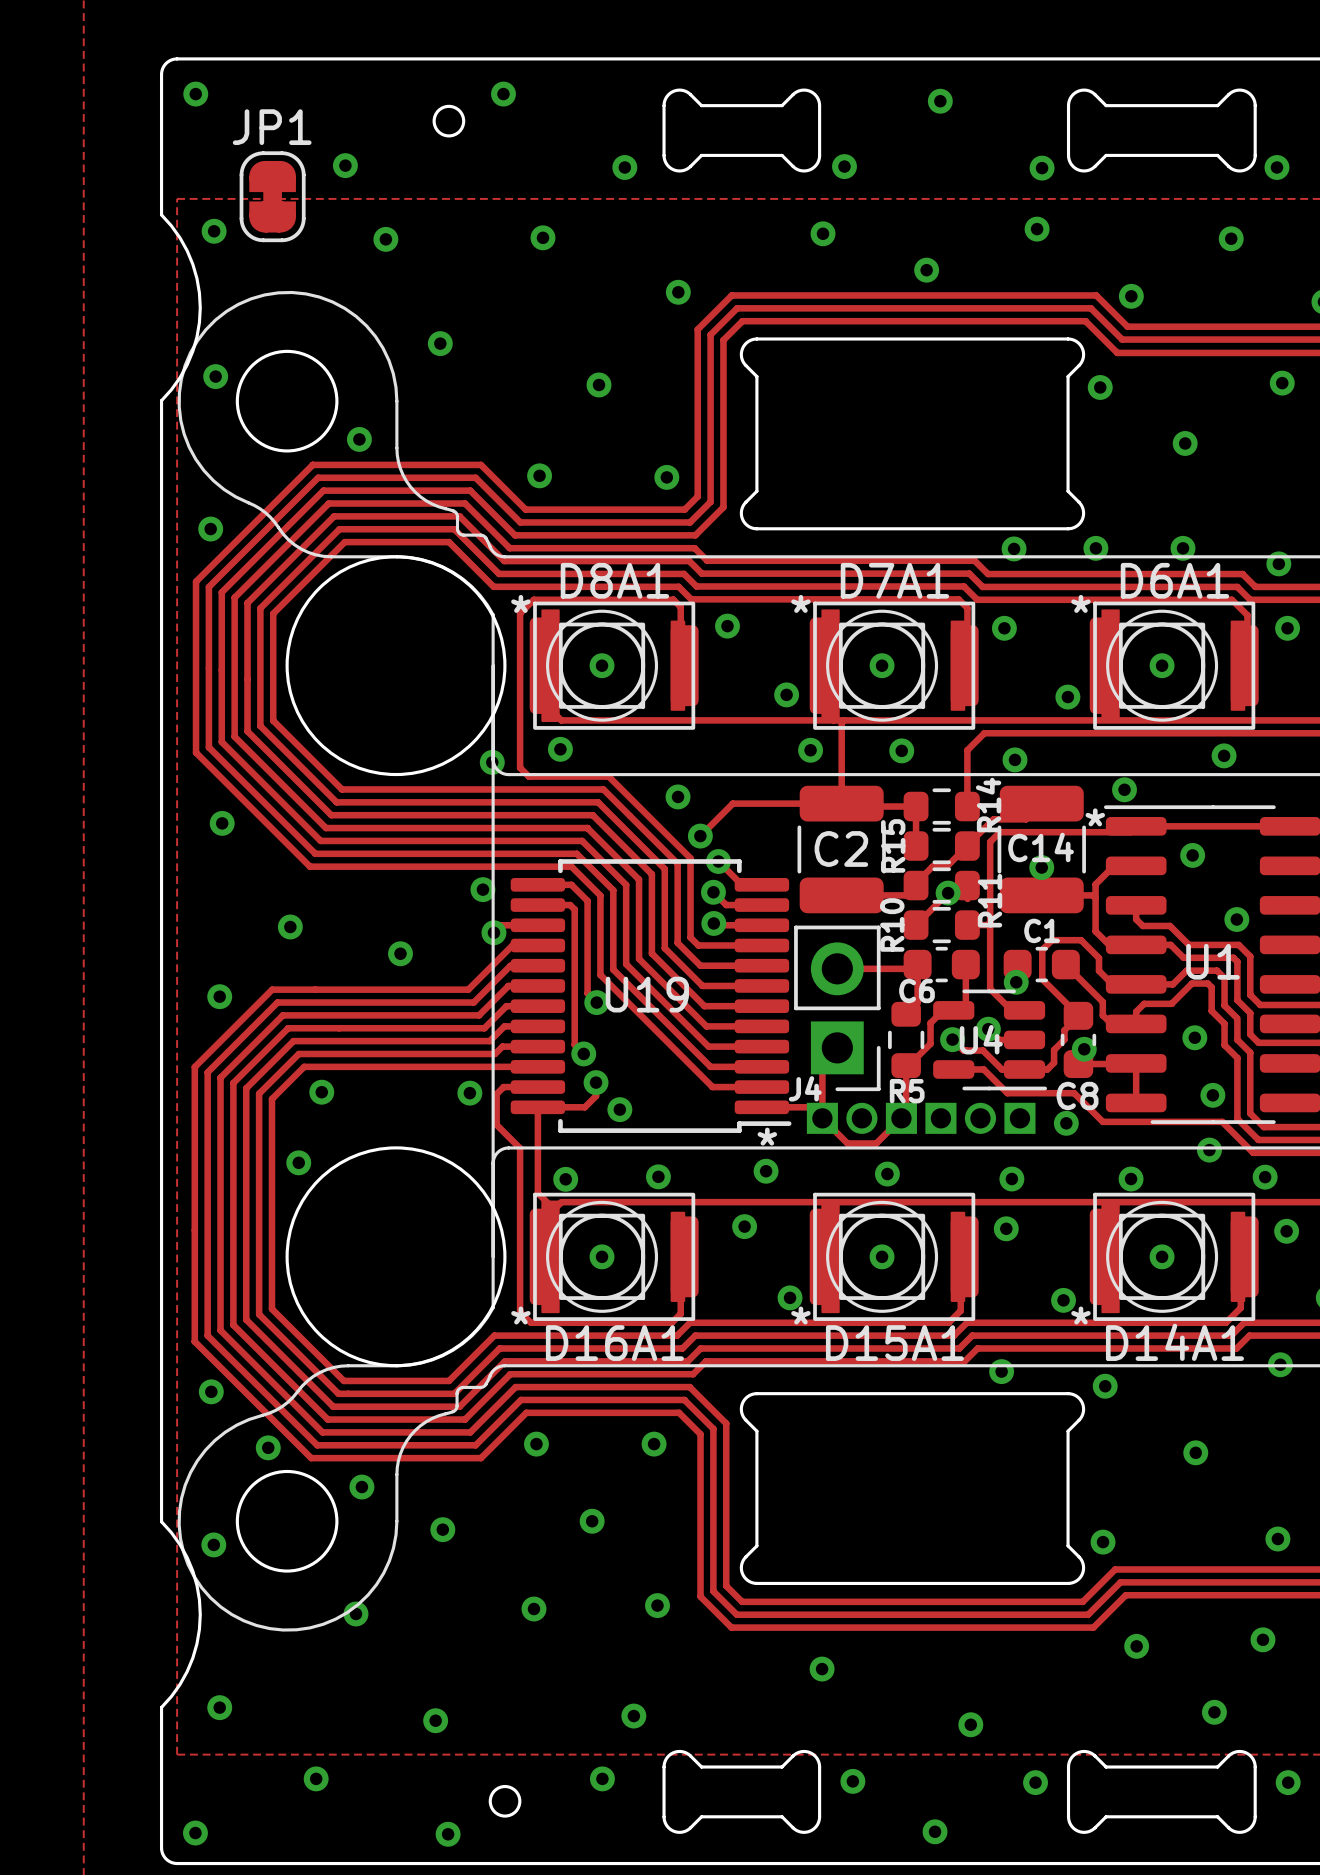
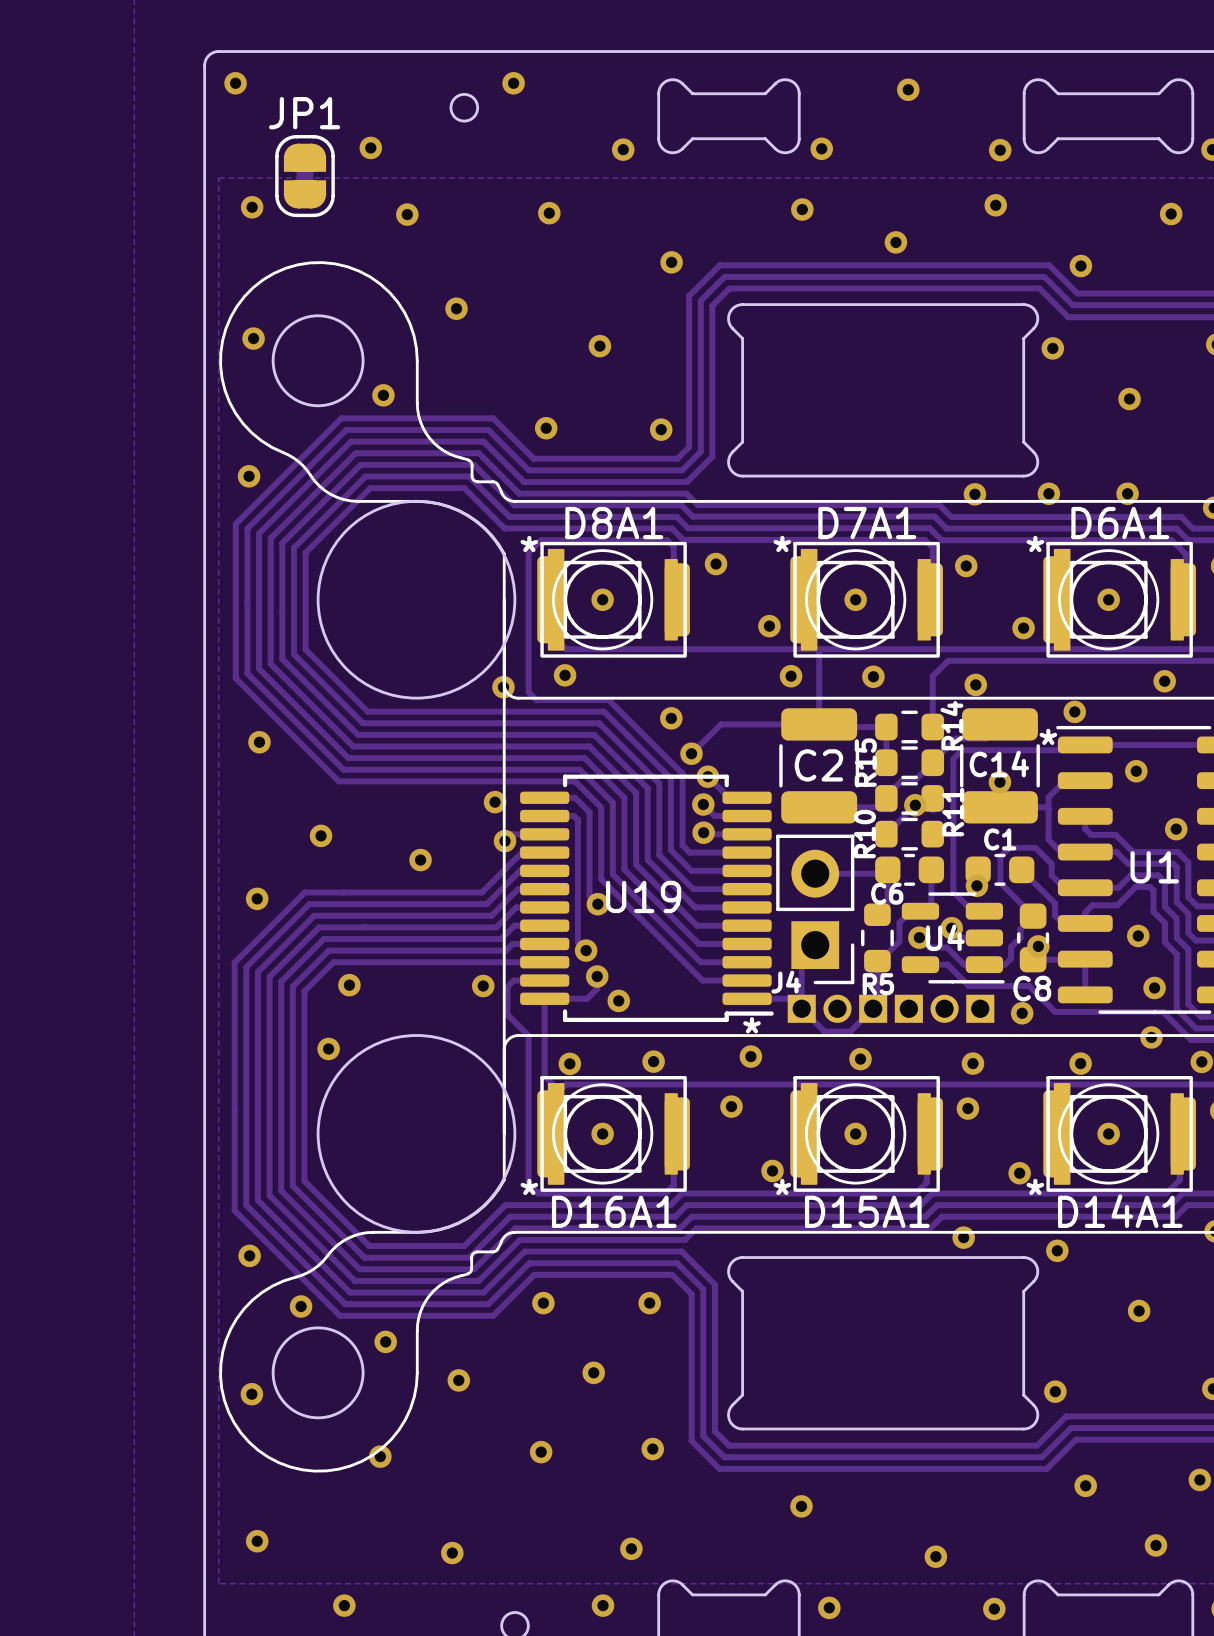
board edge: (161, 214) (180, 237) (192, 264) (199, 293) (200, 307) (199, 322) (192, 351) (180, 377) (161, 400) -> (204, 192) (204, 360)
board edge: (161, 1521) (171, 1532) (187, 1557) (196, 1585) (200, 1614) (196, 1643) (187, 1671) (171, 1696) (161, 1707) -> (204, 1373) (204, 1541)

